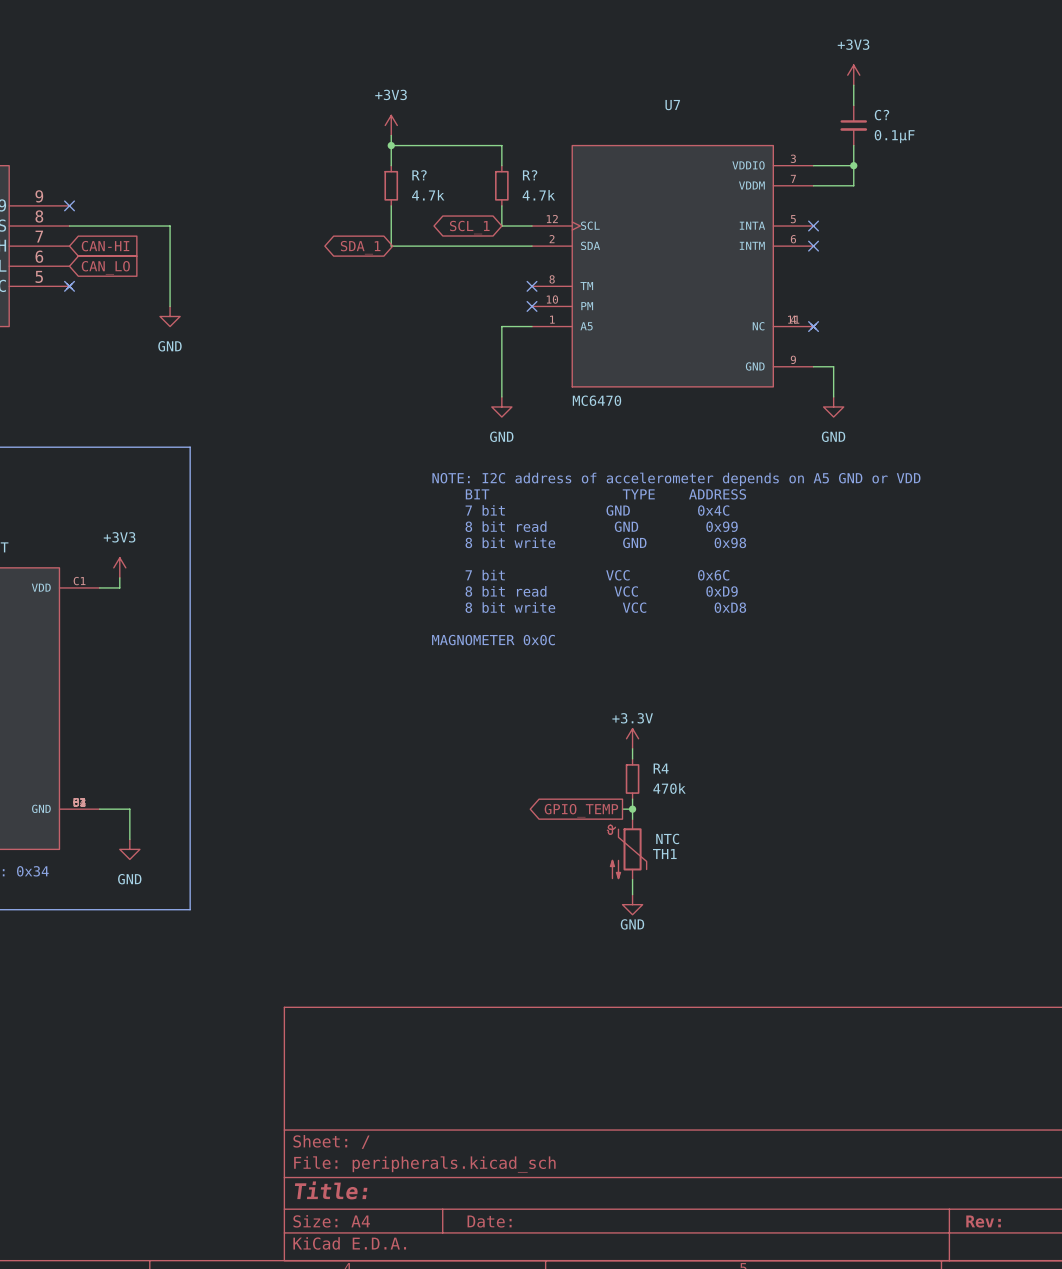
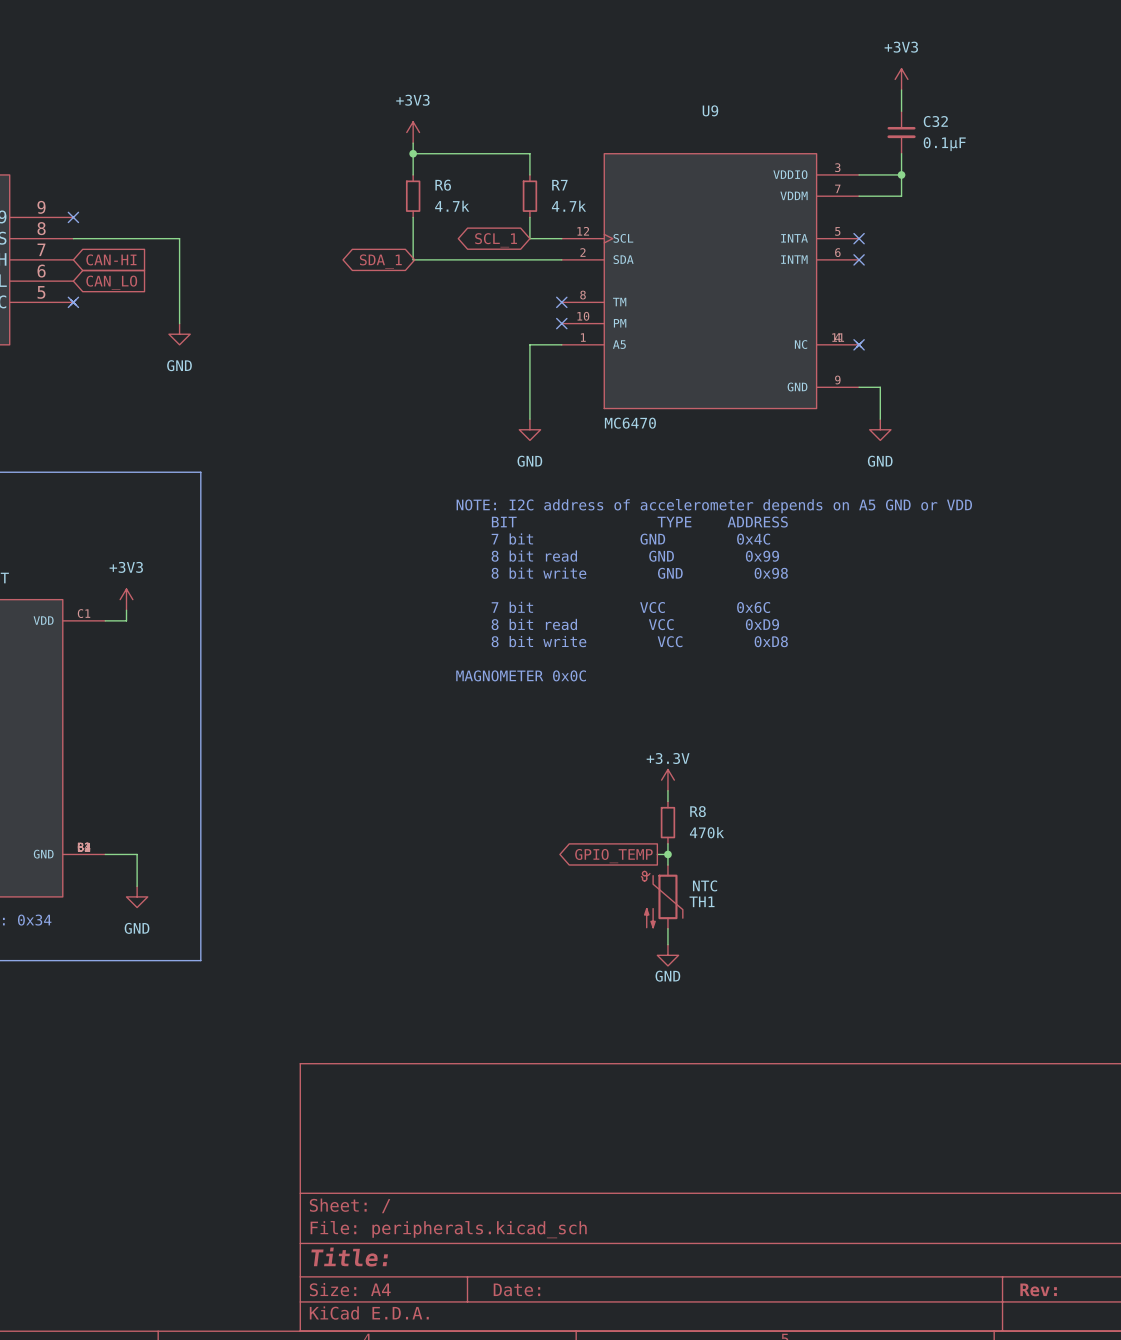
U7 name: U7 (672, 105) -> U9 (710, 110)
C? name: C? (881, 115) -> C32 (935, 121)
R? name: R? (419, 175) -> R6 (443, 185)
R? name: R? (530, 175) -> R7 (559, 185)
R4 name: R4 (661, 768) -> R8 (698, 811)

